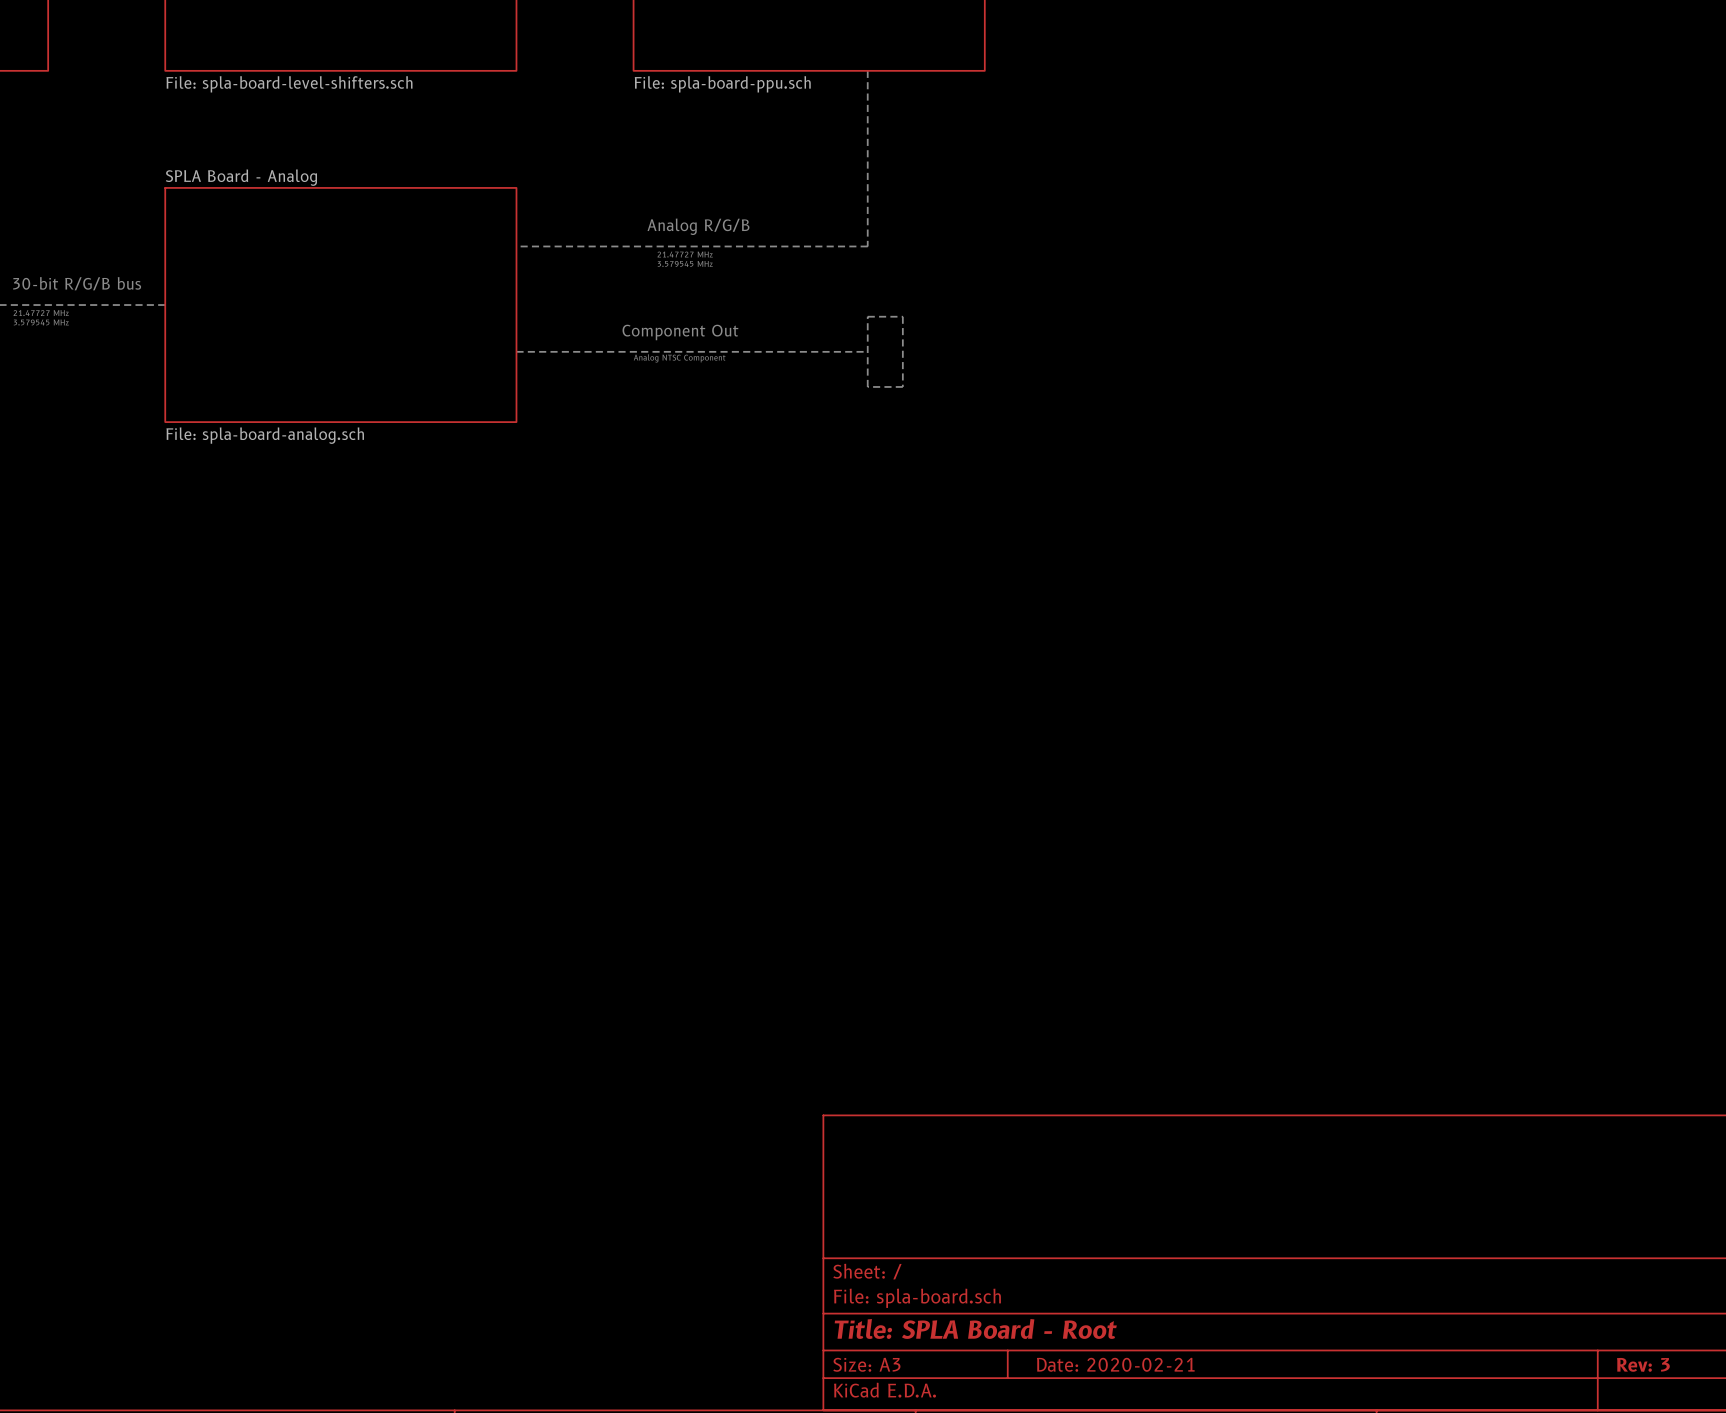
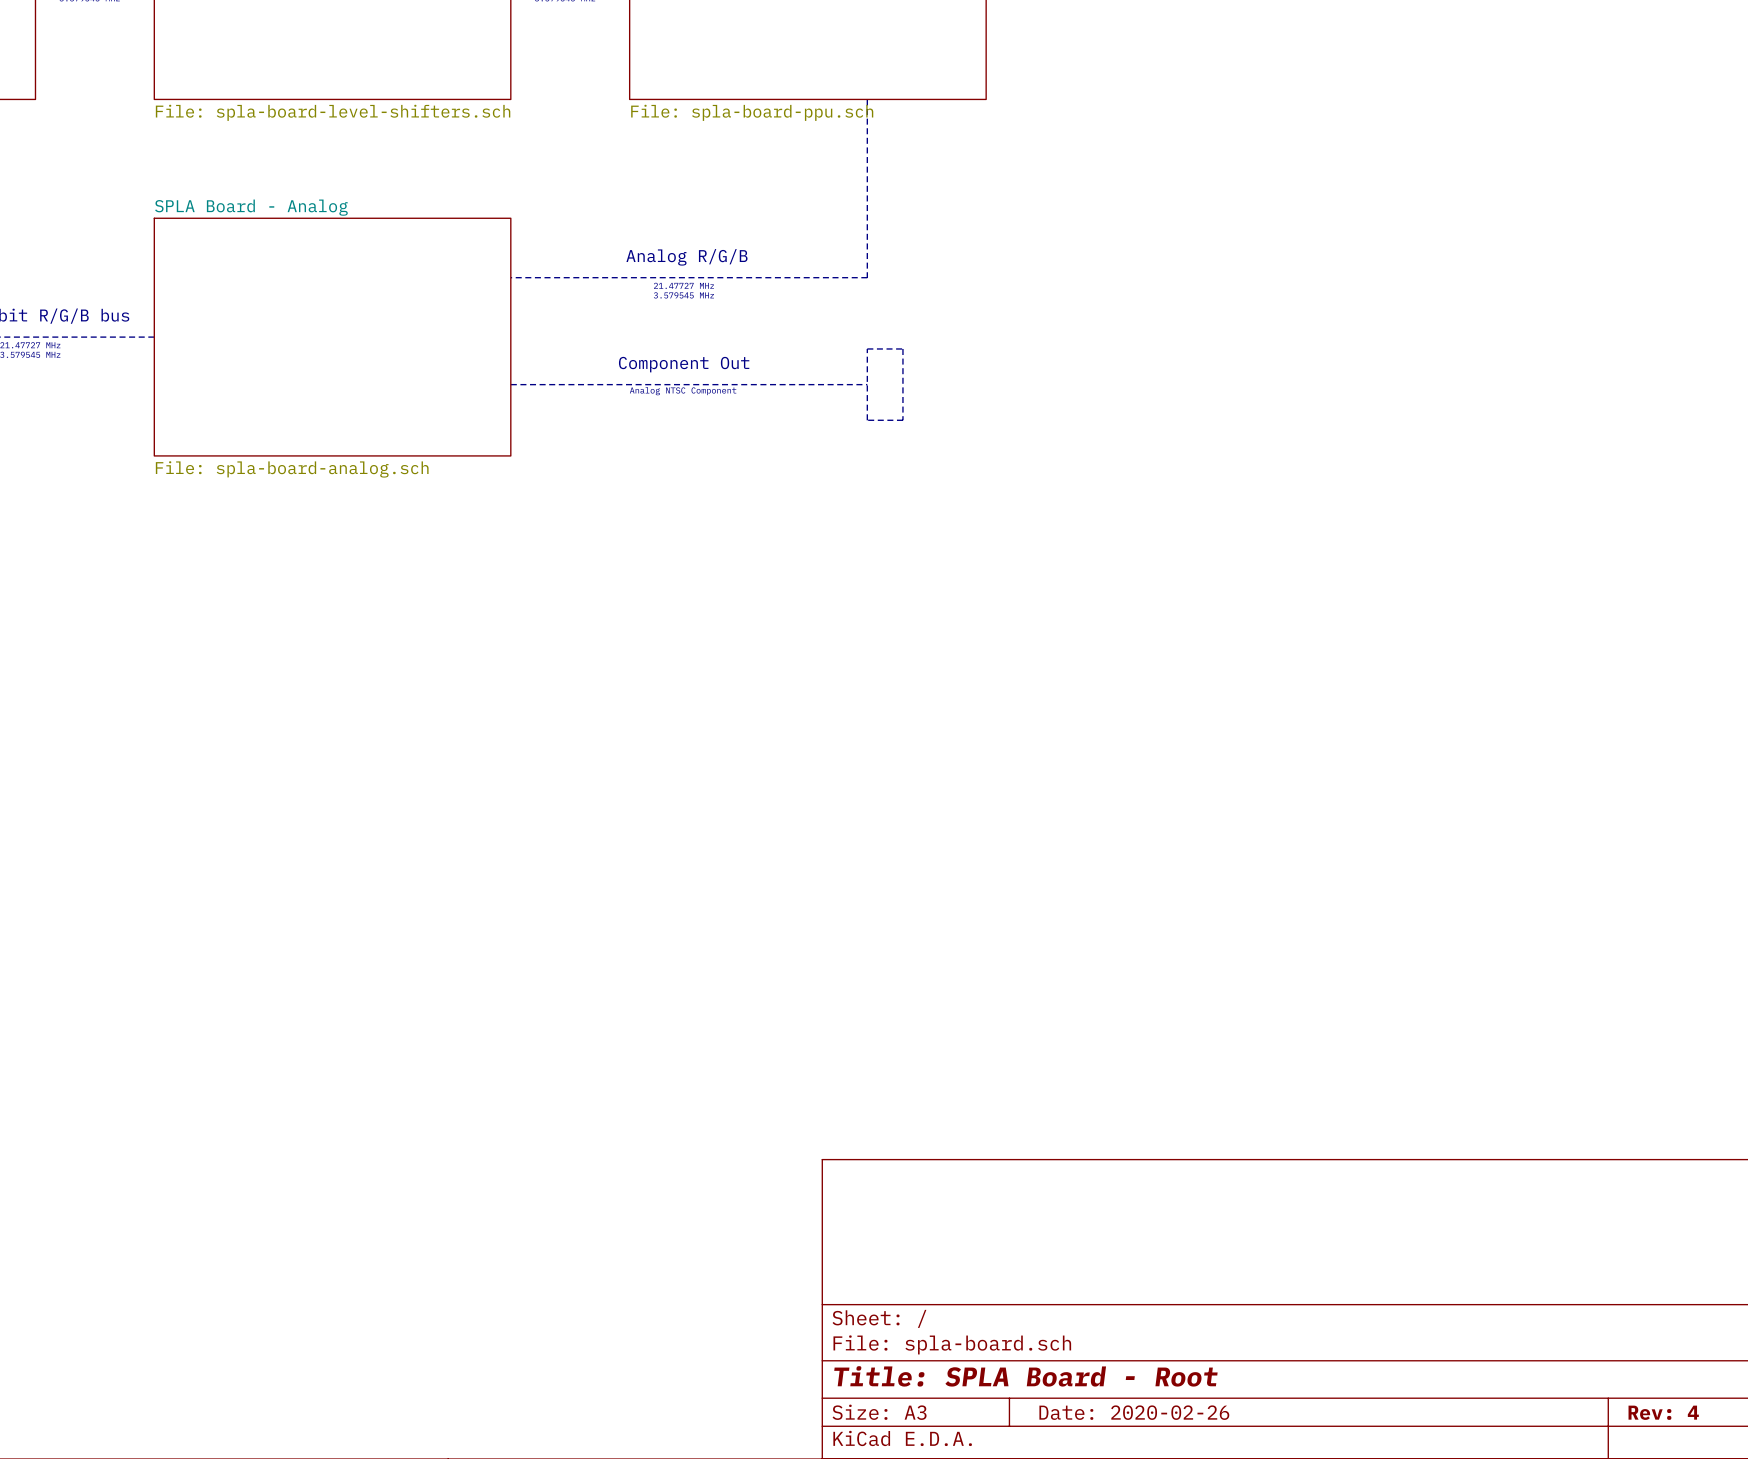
title block: Date: 2020-02-21 (1115, 1364) -> Date: 2020-02-26 (1134, 1412)
title block: Rev: 3 (1643, 1364) -> Rev: 4 (1663, 1412)

